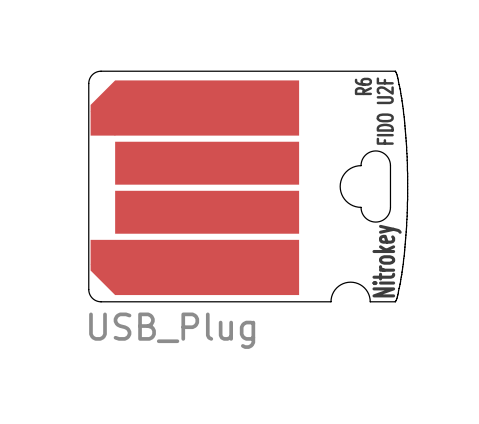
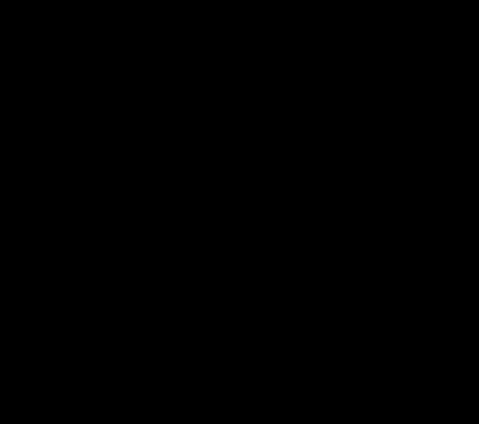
board edge: (101, 71) (395, 71) (403, 108) (407, 173) (404, 255) (395, 301) (370, 301) (364, 287) (350, 282) (336, 287) (330, 301) (101, 301) (93, 299) (88, 289) (88, 83) (92, 74) (101, 71) -> none
text: R6 (363, 86) -> none
text: FIDO U2F (385, 111) -> none
board edge: (390, 165) (390, 207) -> none
board edge: (390, 165) (388, 158) (383, 152) (370, 152) (363, 158) (361, 165) (353, 167) (344, 173) (340, 186) (344, 199) (353, 205) (361, 207) (363, 214) (370, 220) (383, 220) (388, 214) (390, 207) -> none
part: USB_Plug (194, 187) -> none
text: Nitrokey (387, 261) -> none

